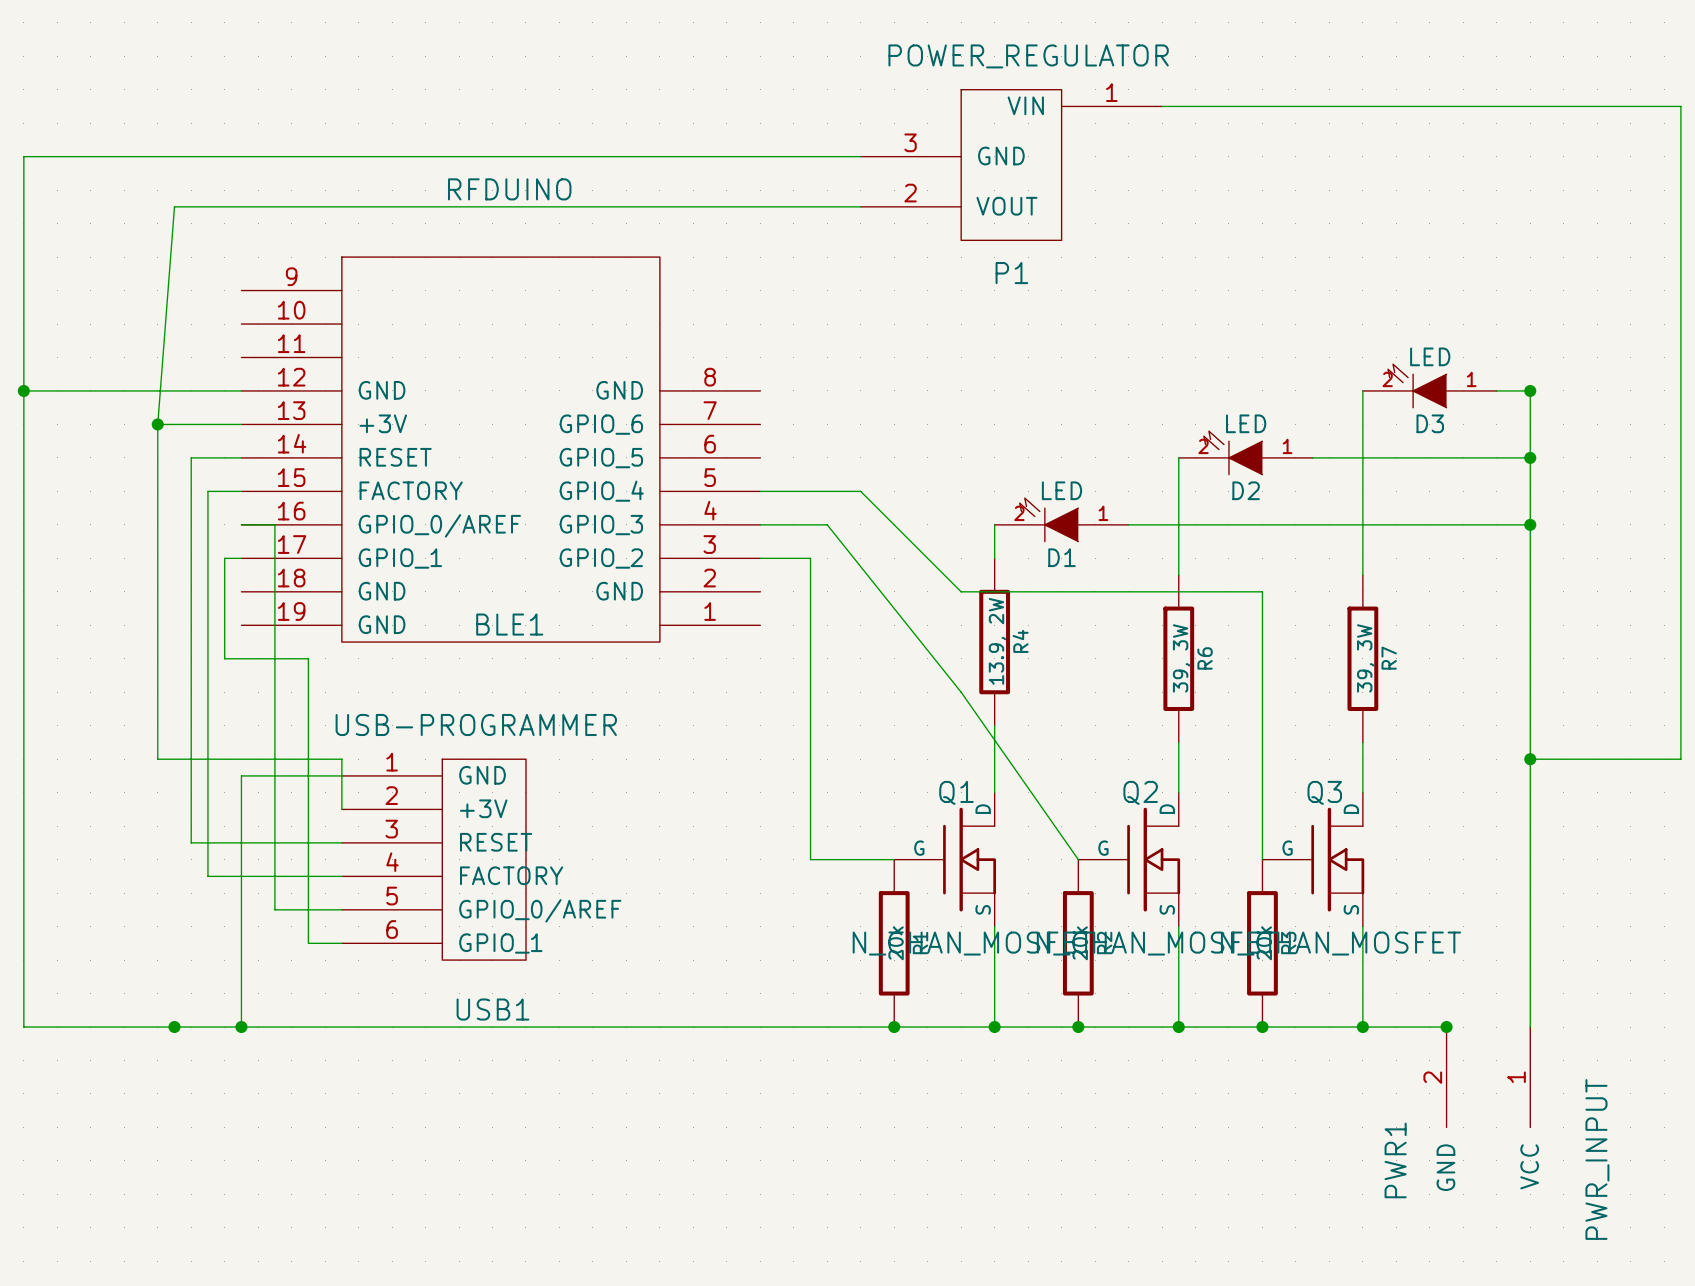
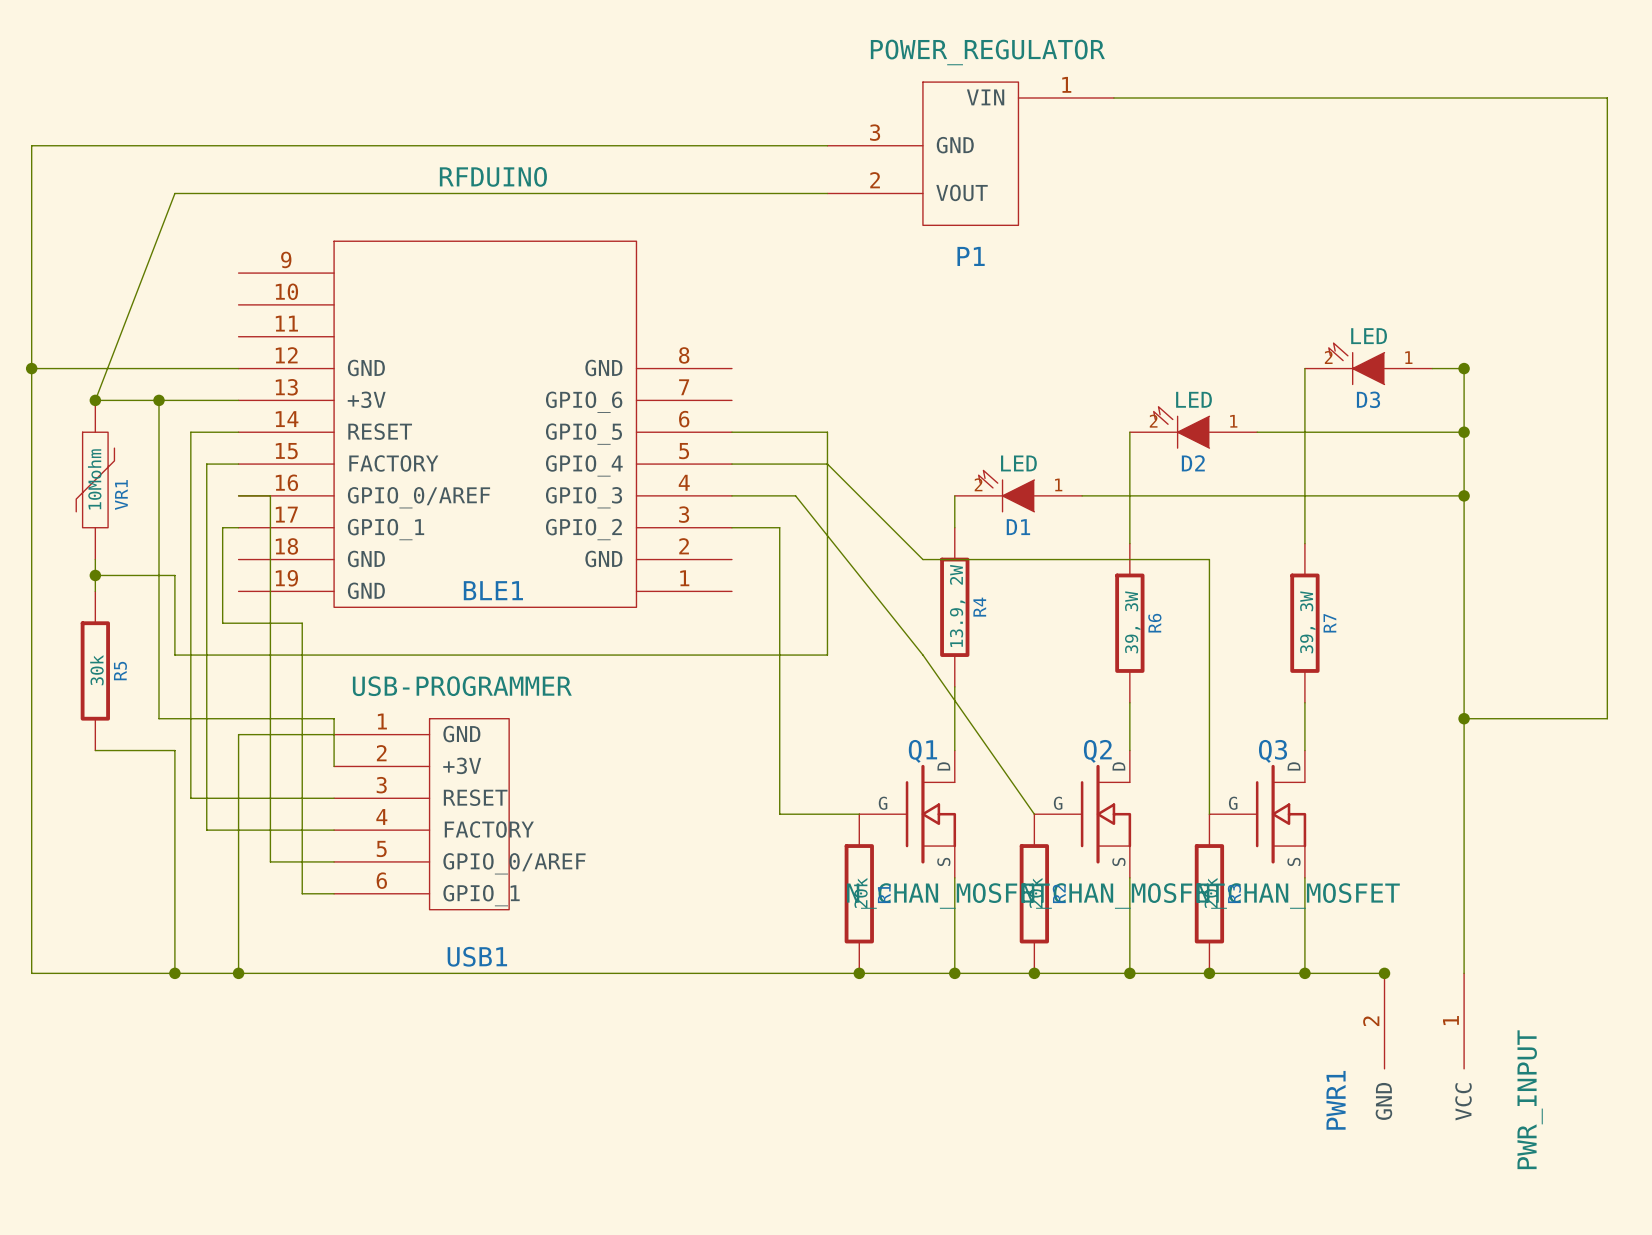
wire: (174, 206) (157, 424) -> (174, 193) (95, 400) (159, 400)
junction: none -> (95, 400)
wire: none -> (731, 432) (827, 432) (827, 655) (174, 655) (174, 575) (95, 575)
VR1: none -> 10Mohm (95, 479)
wire: none -> (95, 559) (95, 591)
junction: none -> (95, 575)
R5: none -> 30k (95, 670)
wire: none -> (95, 750) (174, 750) (174, 973)

